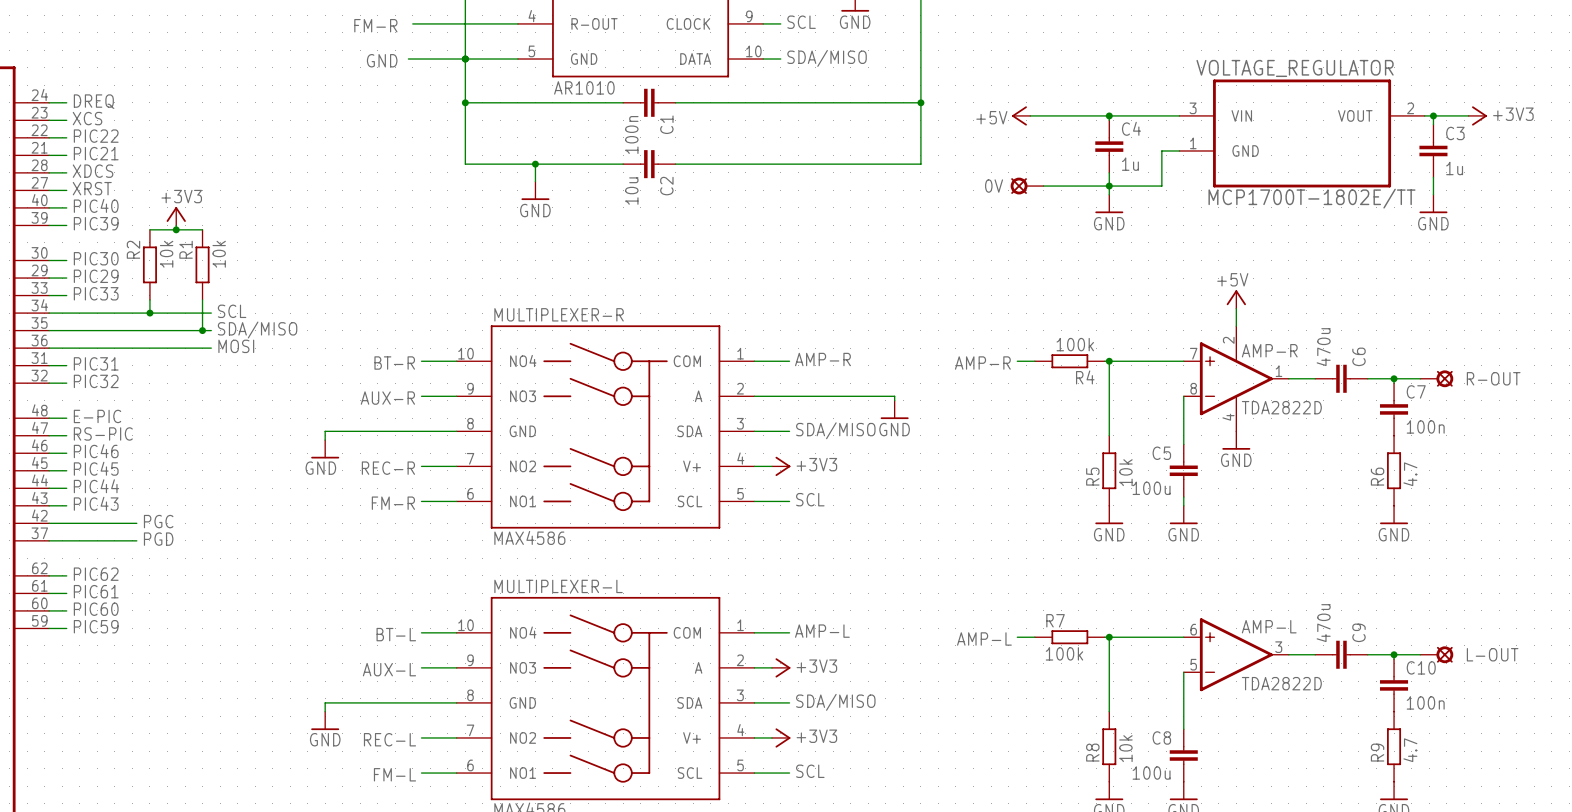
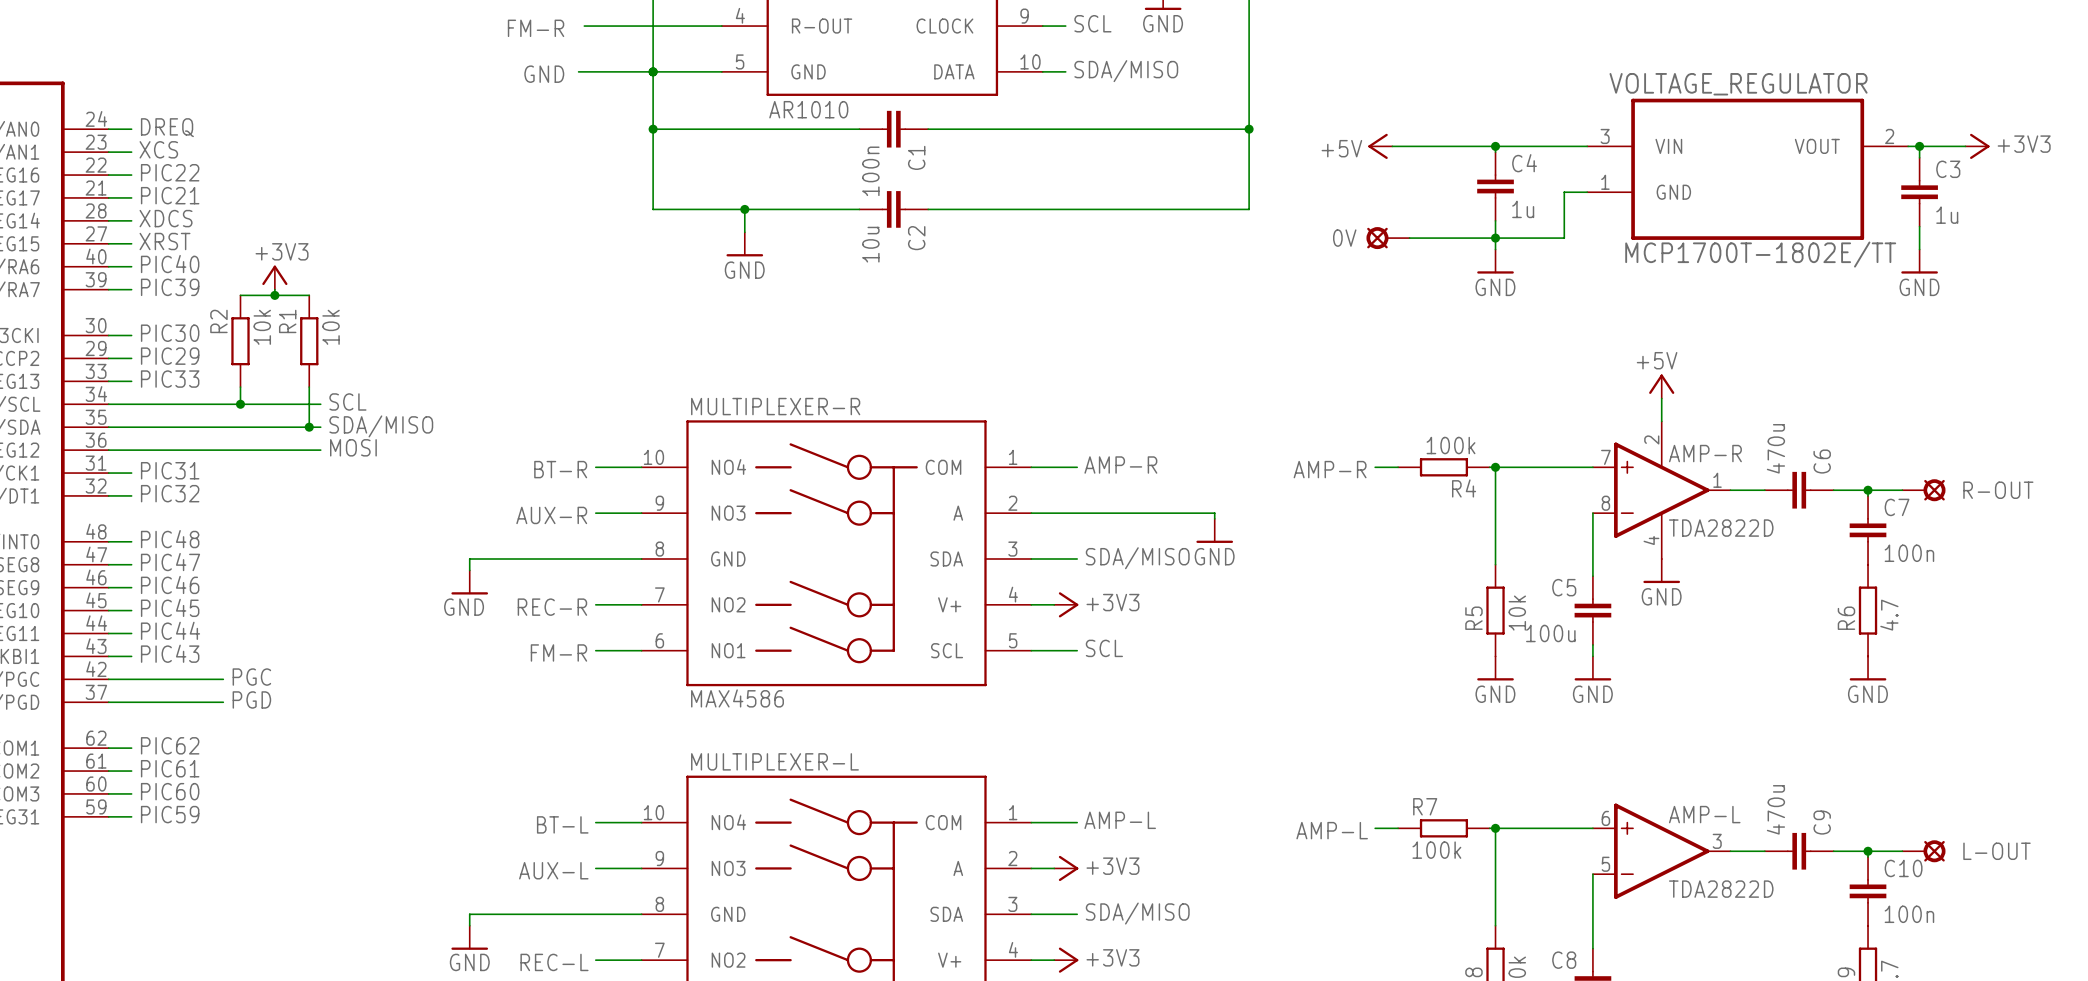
label: E-PIC (97, 416) -> PIC48 (170, 539)
label: RS-PIC (103, 433) -> PIC47 (170, 562)

